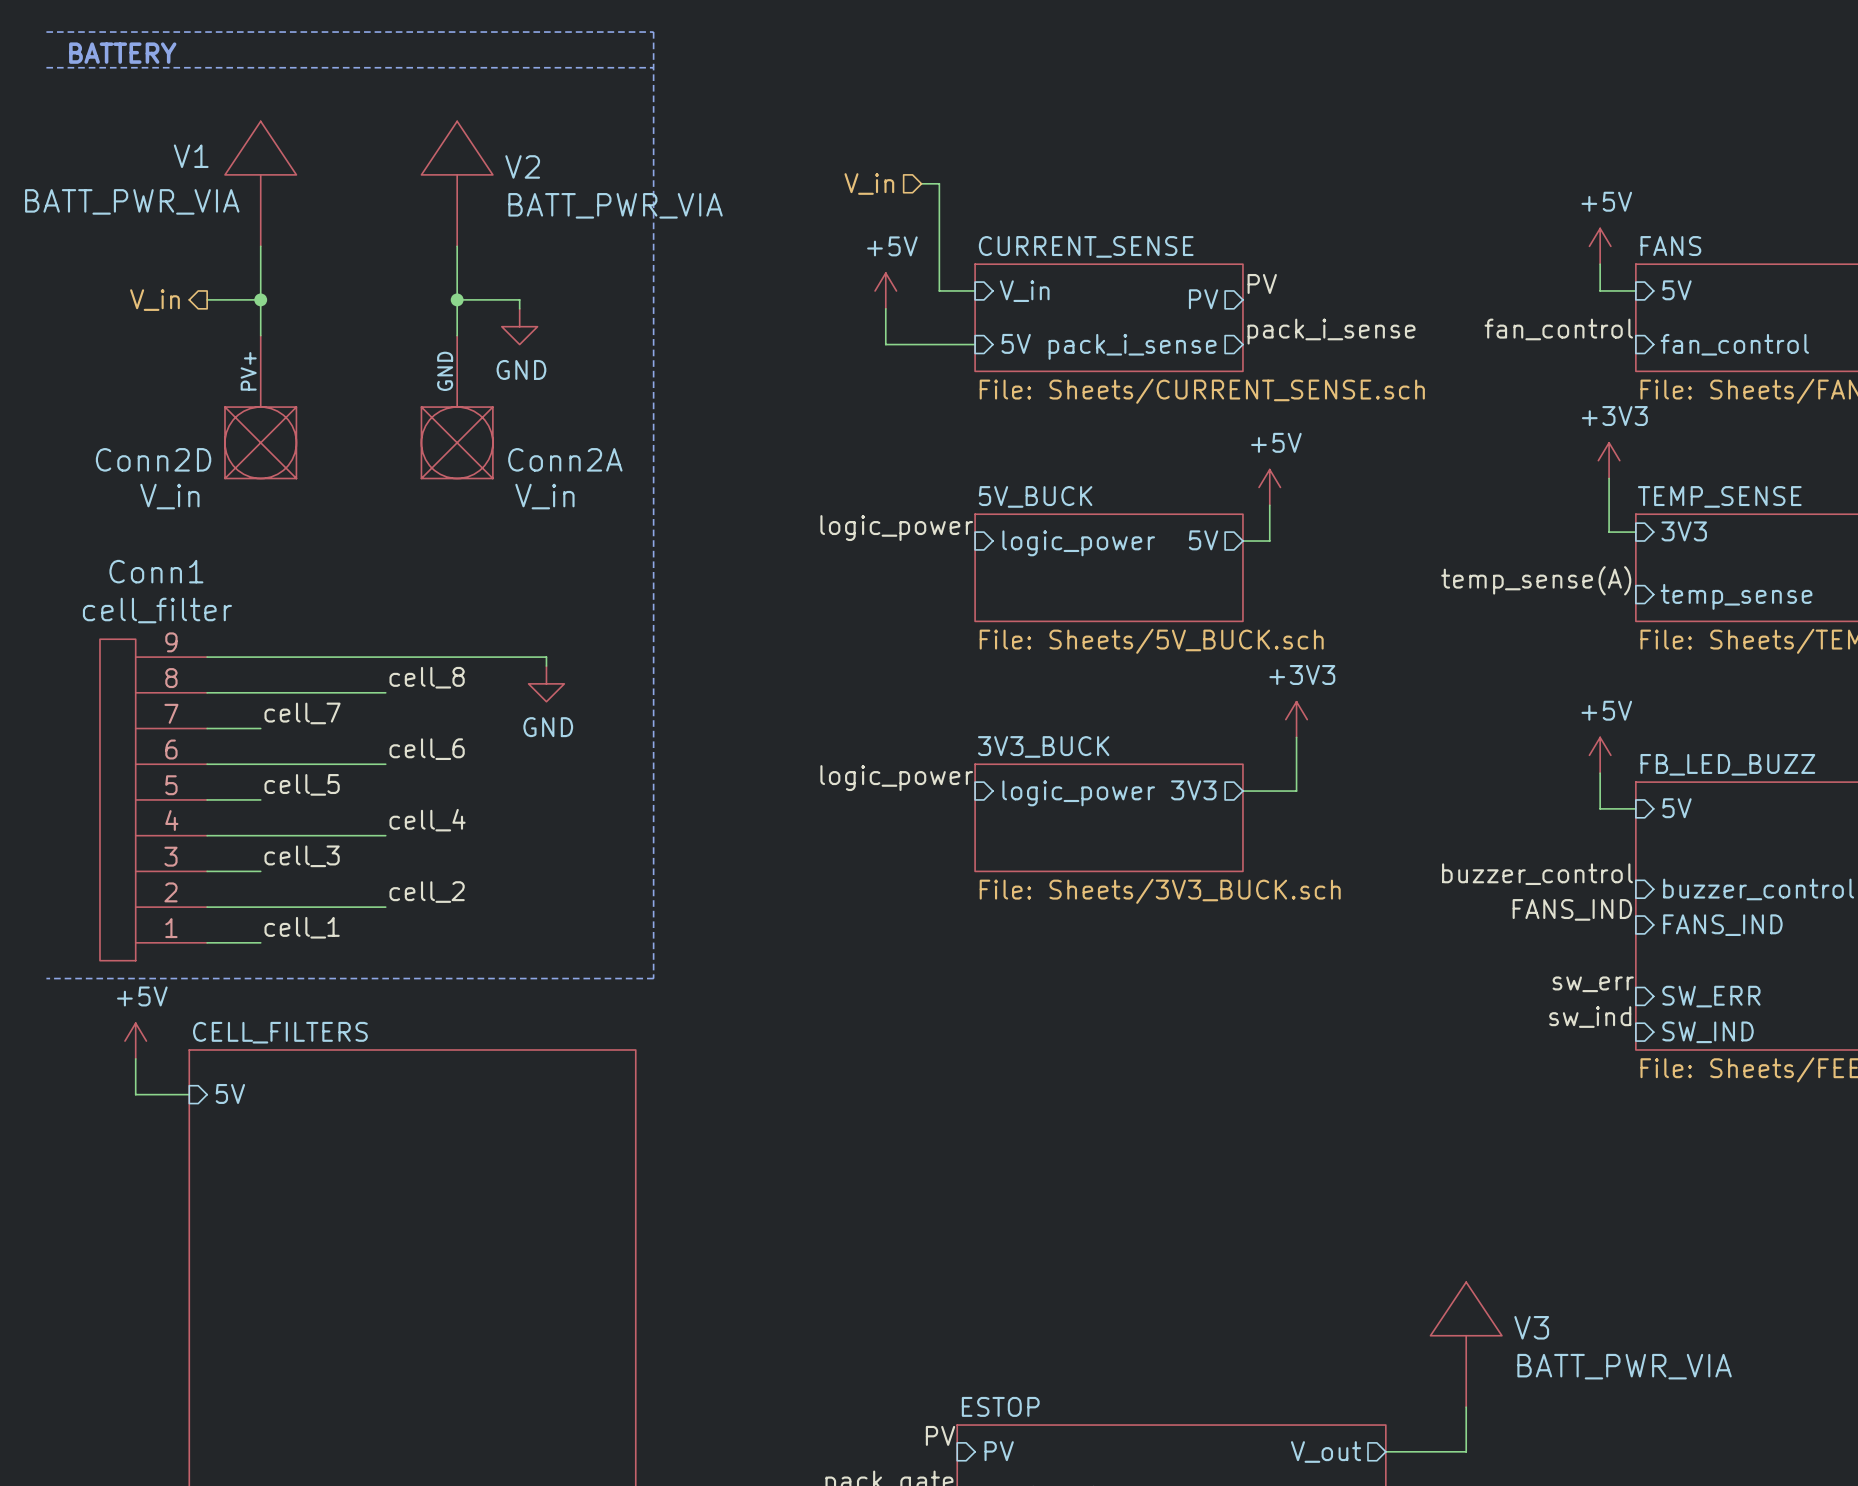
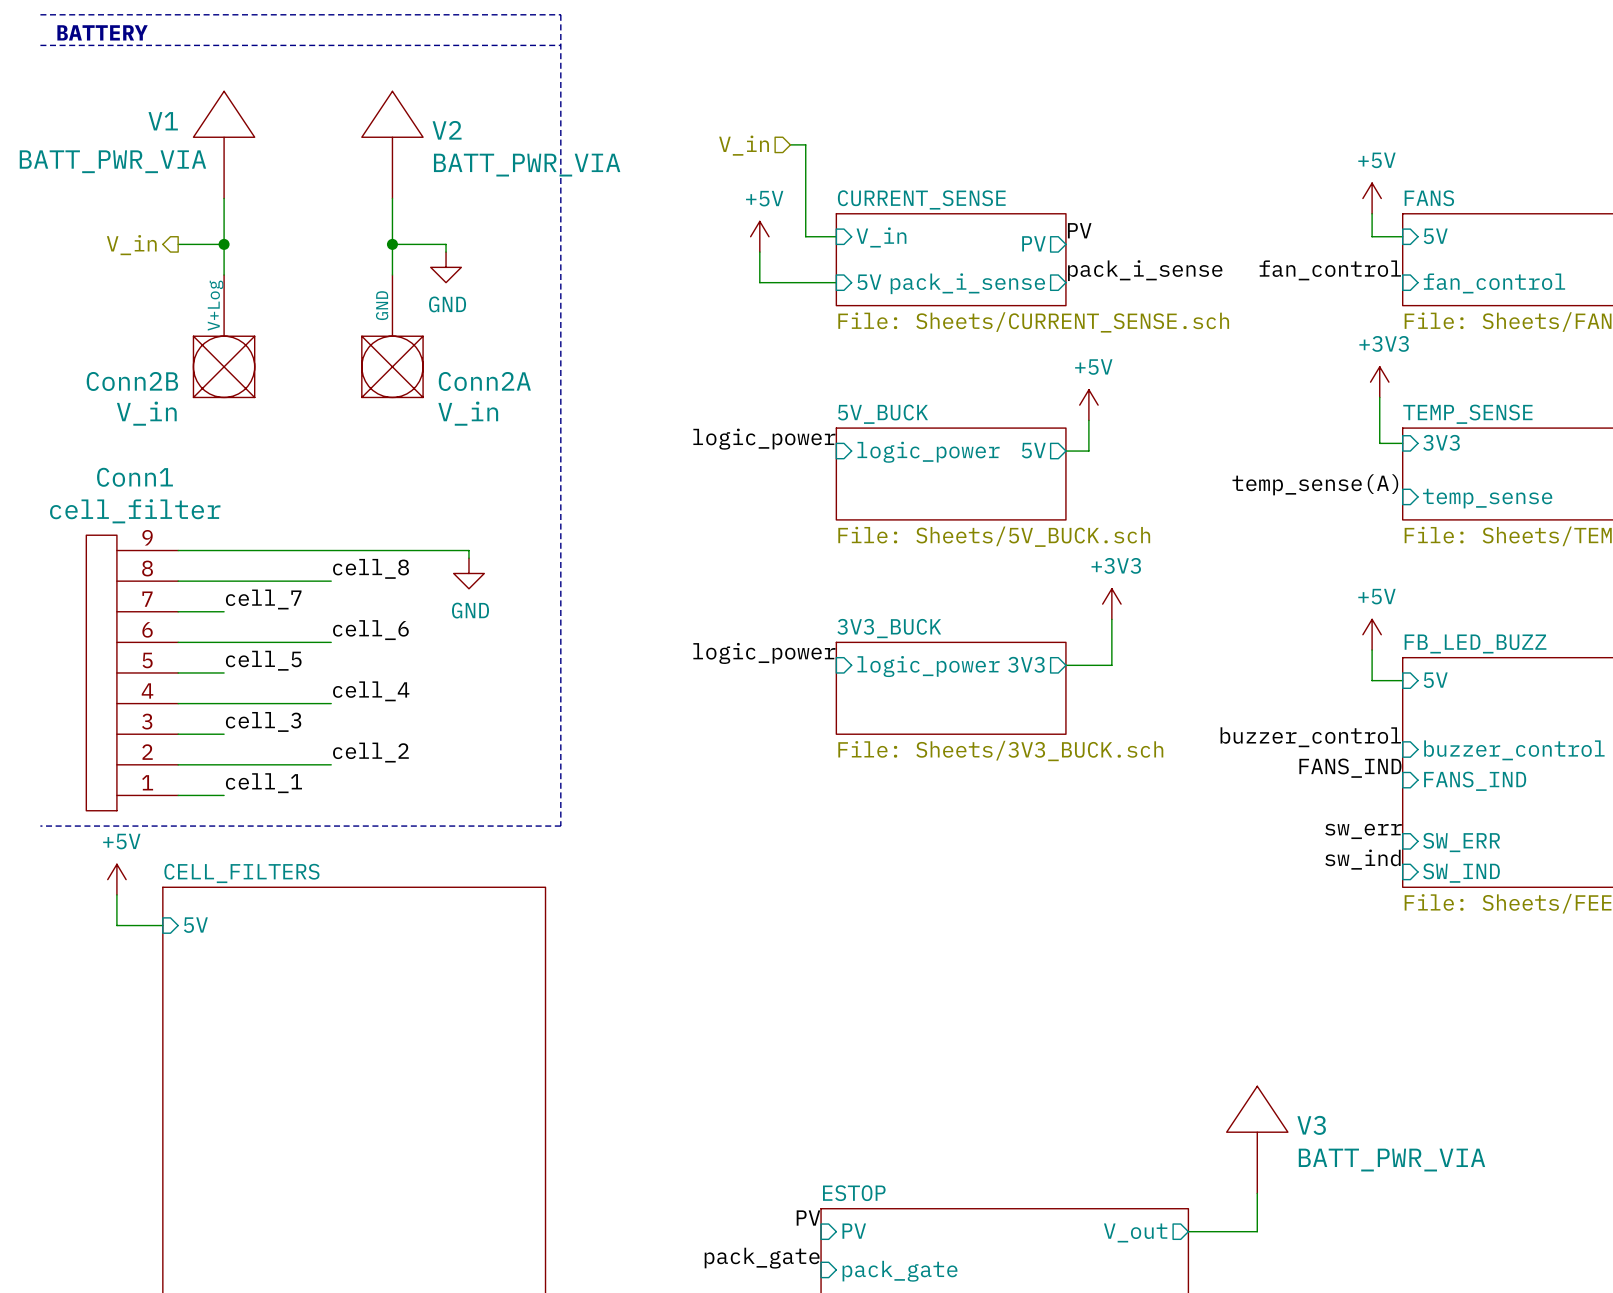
Conn2D pin name: PV+ (248, 371) -> V+Log (215, 305)
Conn2D name: Conn2D (153, 459) -> Conn2B (132, 381)

